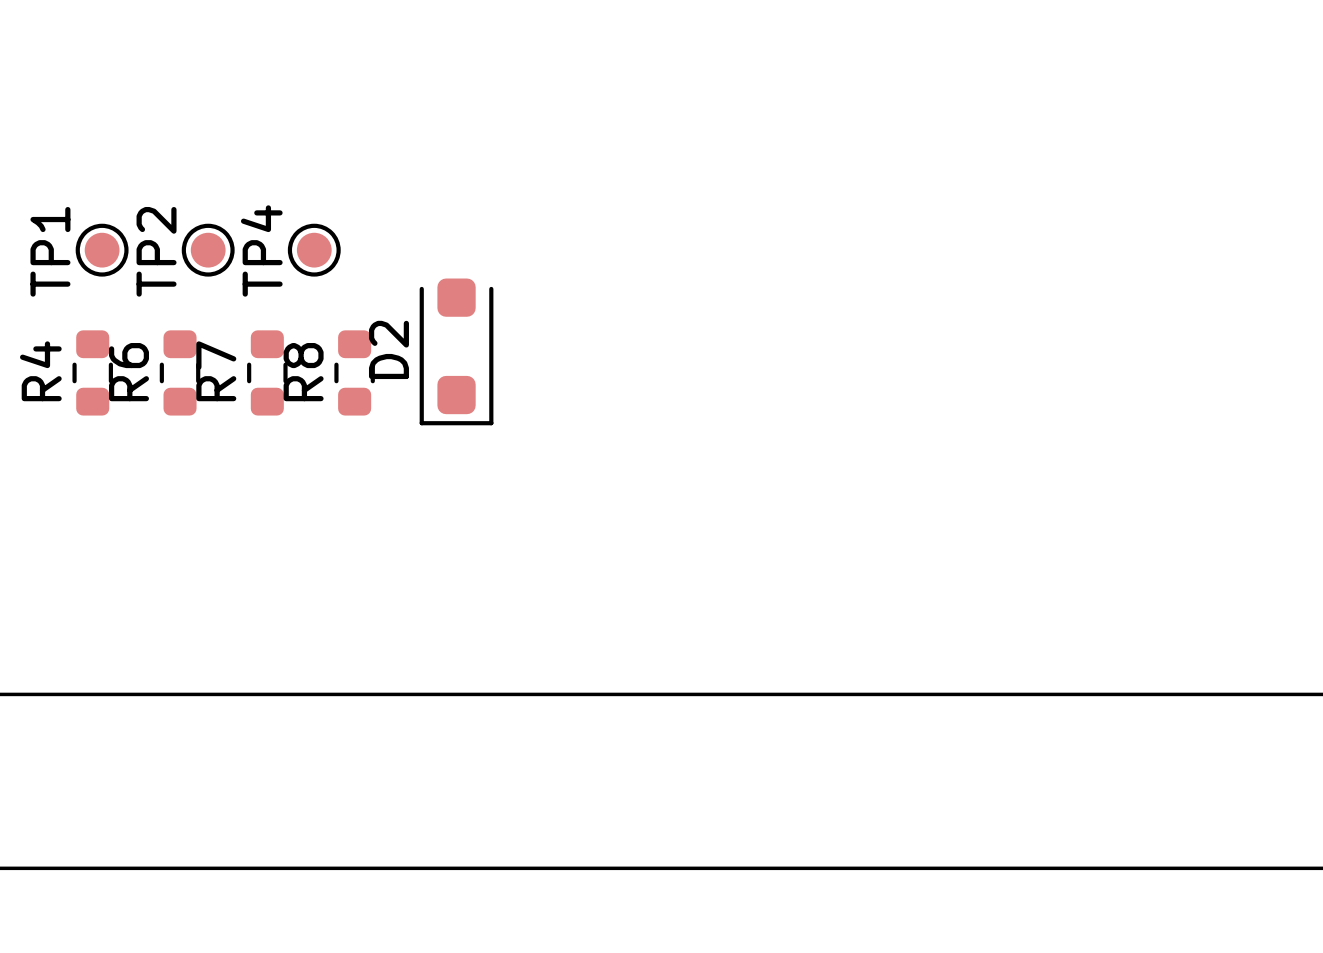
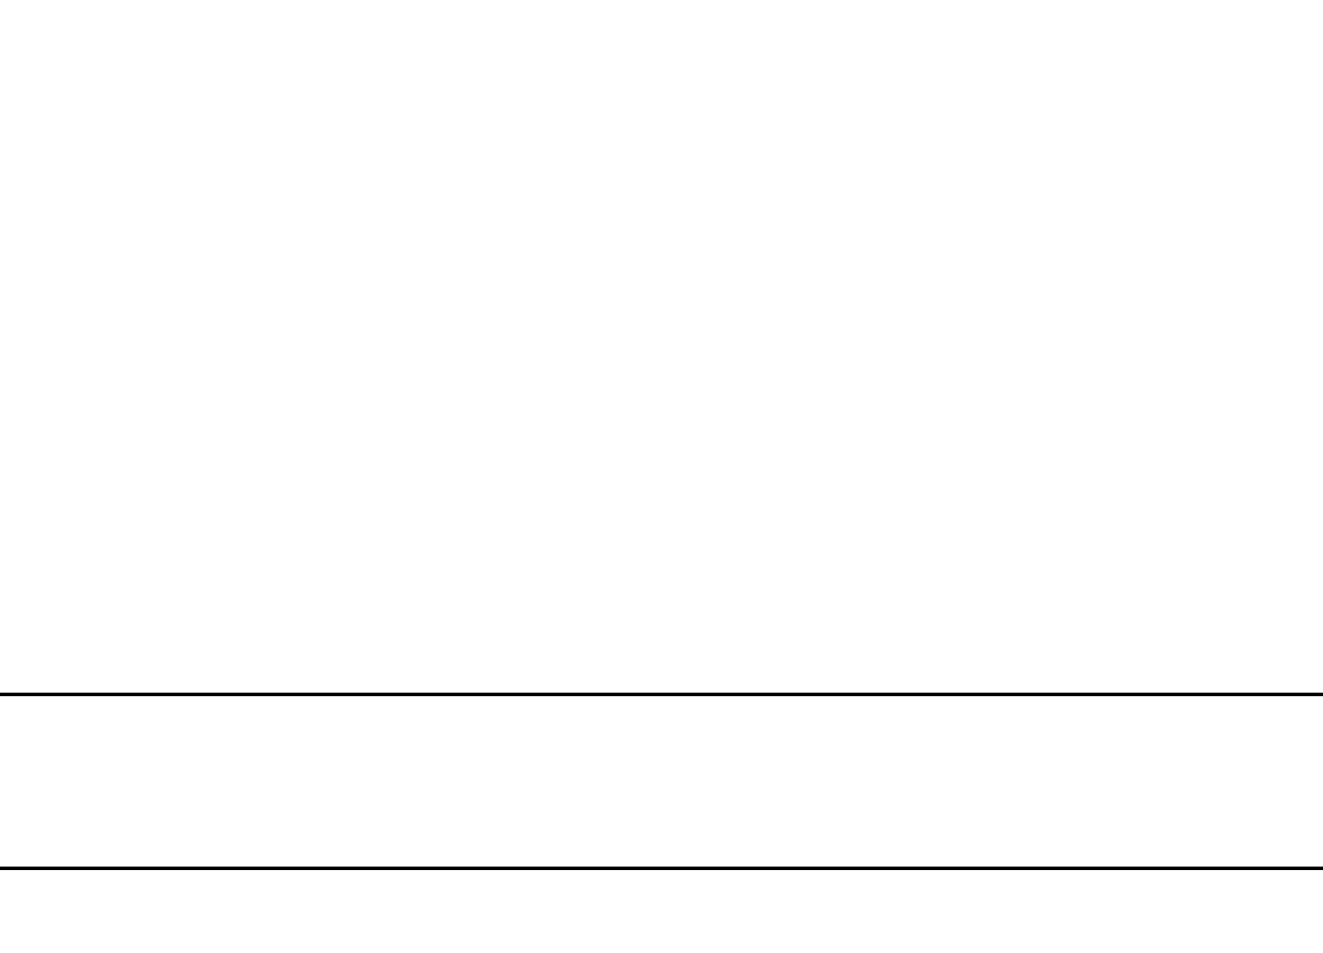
TP1: (102, 250) -> none
TP2: (208, 250) -> none
TP4: (314, 250) -> none
D2: (456, 351) -> none
R4: (92, 372) -> none
R6: (180, 372) -> none
R7: (267, 372) -> none
R8: (354, 372) -> none

